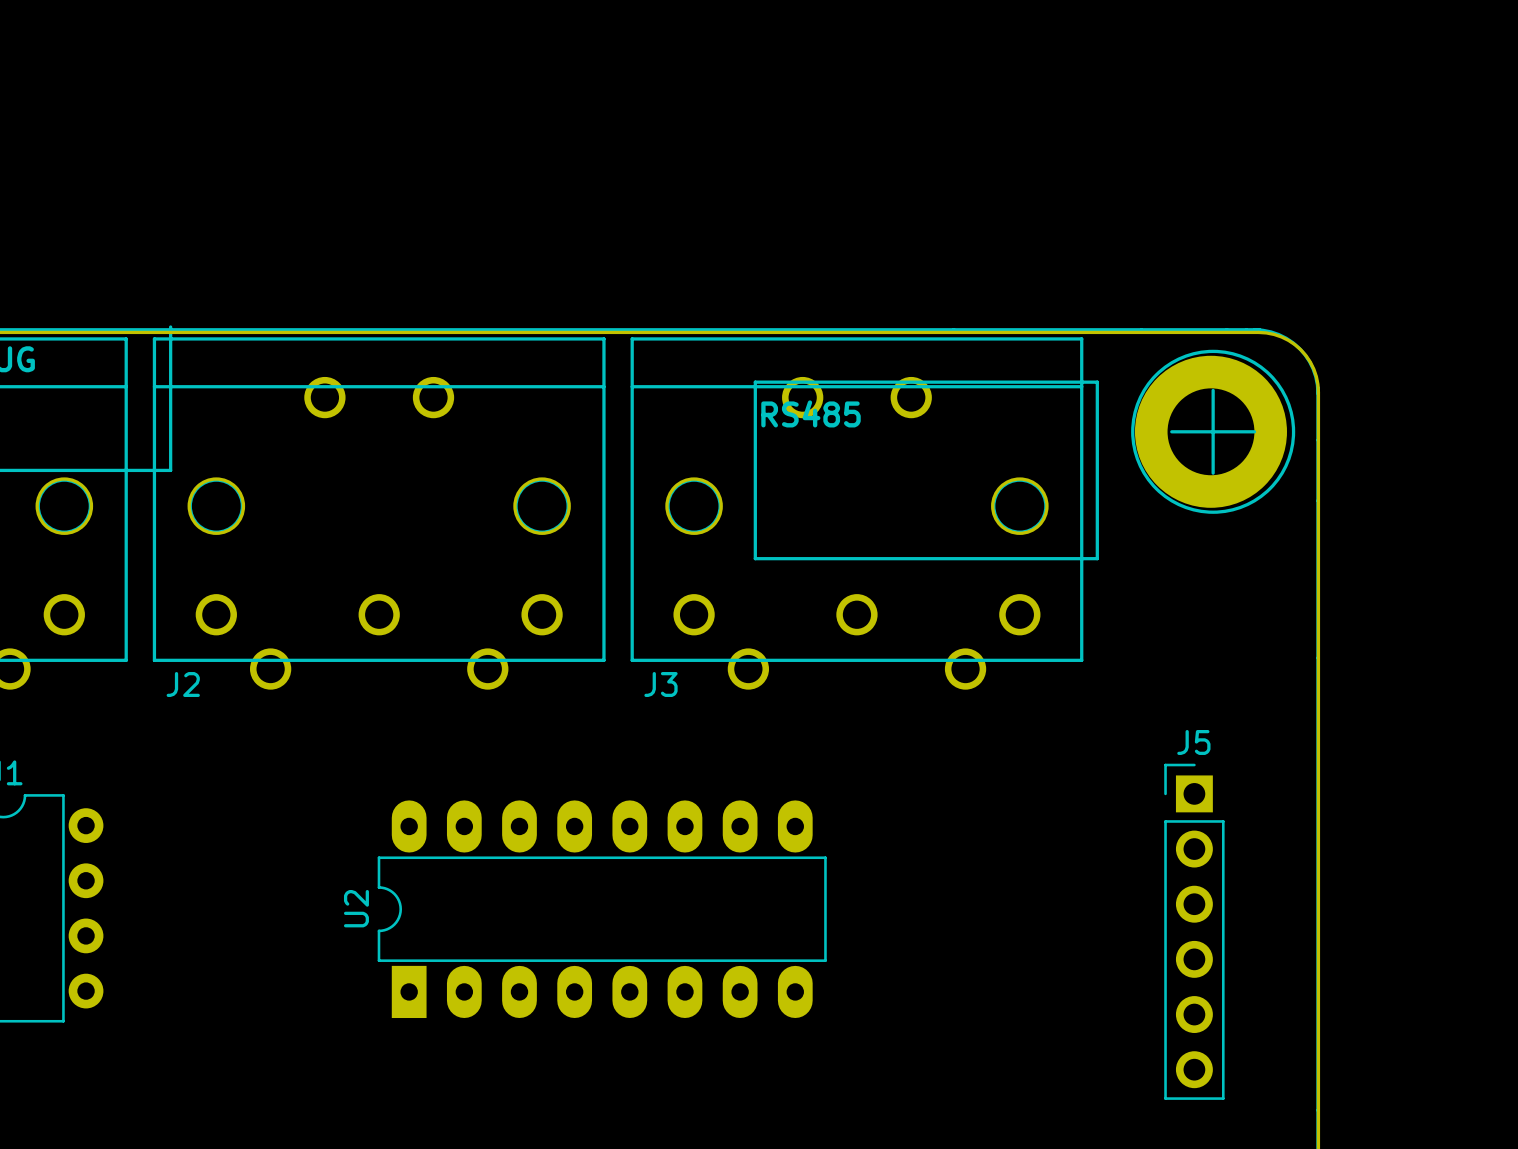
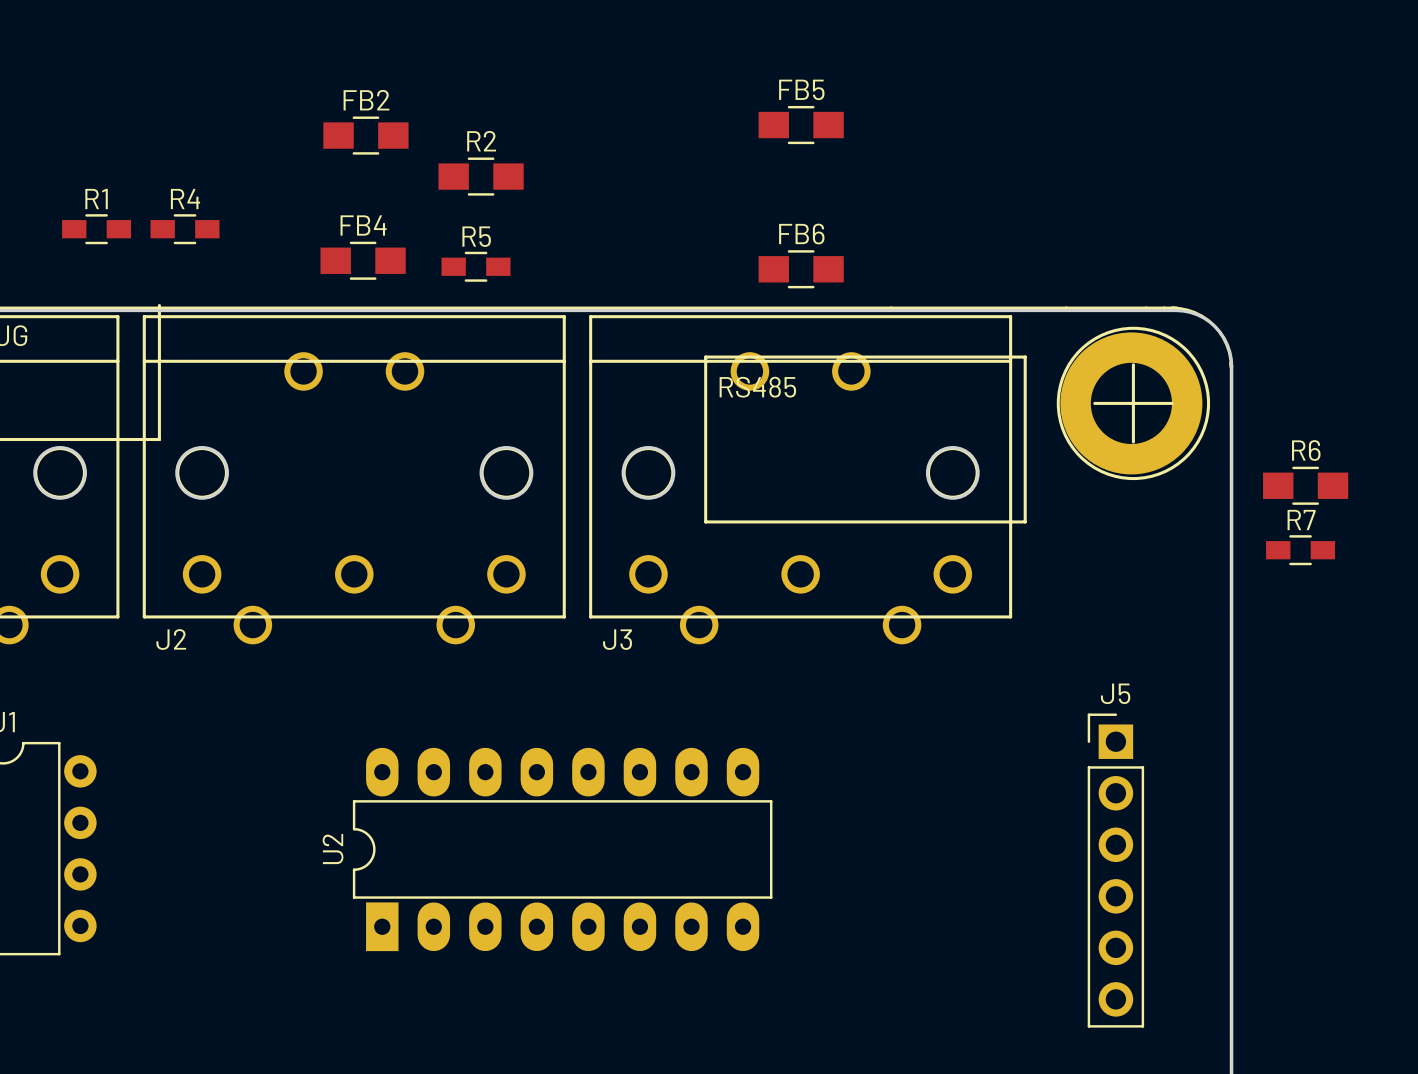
FB5: none -> (801, 125)
FB2: none -> (365, 135)
R2: none -> (481, 176)
R1: none -> (96, 229)
R4: none -> (185, 229)
FB4: none -> (363, 260)
R5: none -> (476, 266)
FB6: none -> (801, 269)
R6: none -> (1305, 485)
R7: none -> (1300, 550)

